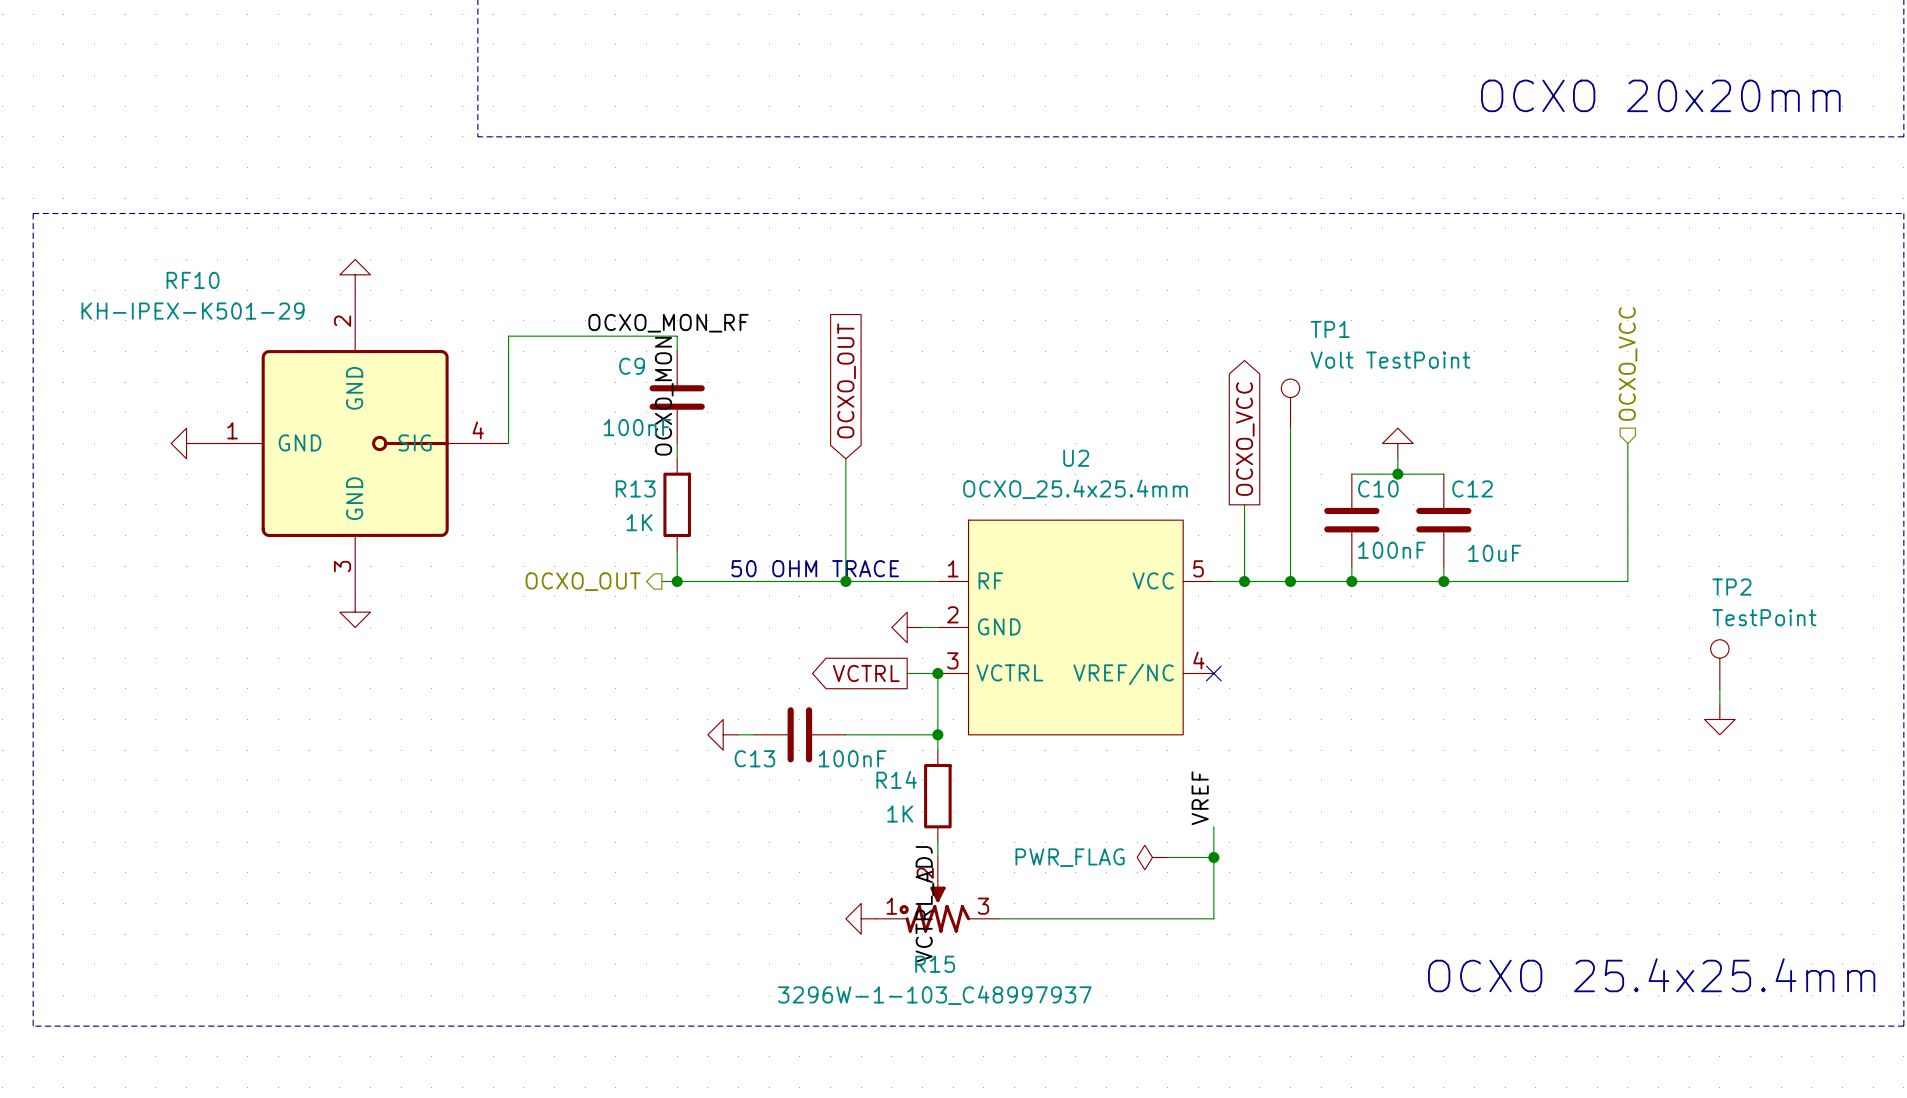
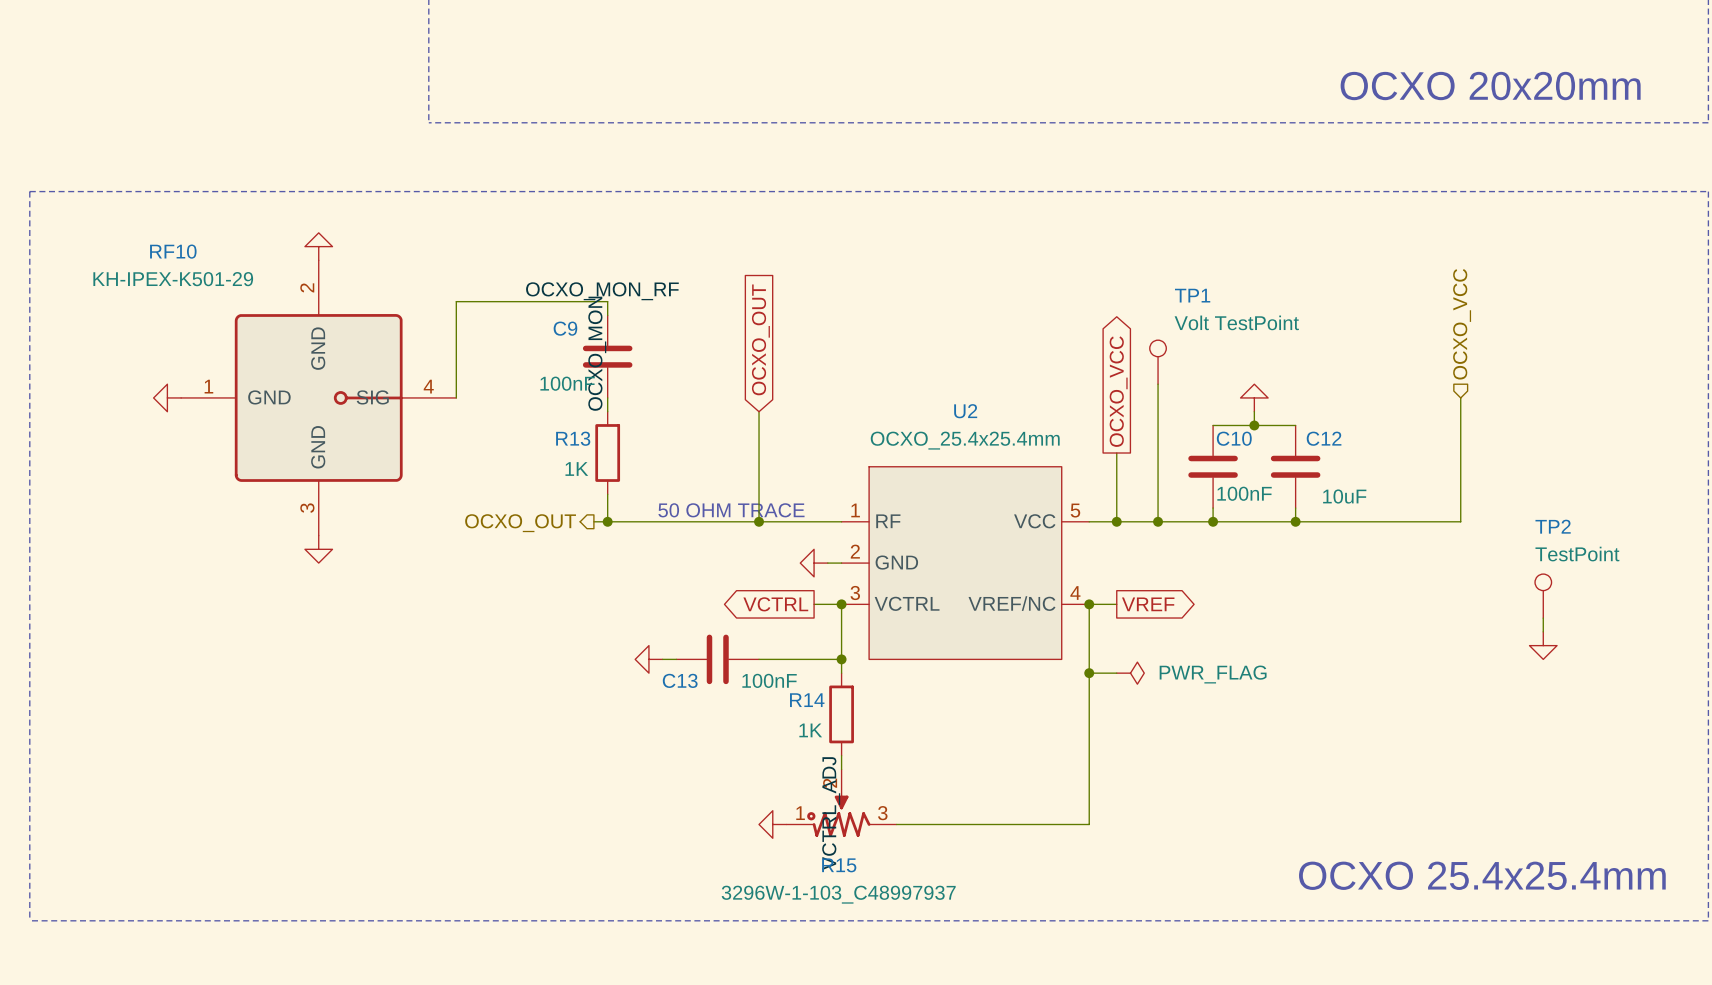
junction: none -> (1089, 604)
no-connect mark: (1213, 673) -> none
wire: none -> (1116, 604) (1089, 604) (1089, 741)
global label: none -> VREF (1148, 604)
wire: none -> (1089, 673) (1116, 673)
junction: none -> (1089, 673)
label: VREF (1200, 798) -> none
power symbol rotation: 0° (1152, 857) -> 180° (1130, 673)
power symbol position: PWR_FLAG (1152, 857) -> PWR_FLAG (1130, 673)
wire: (1167, 857) (1213, 857) -> none
junction: (1213, 857) -> none

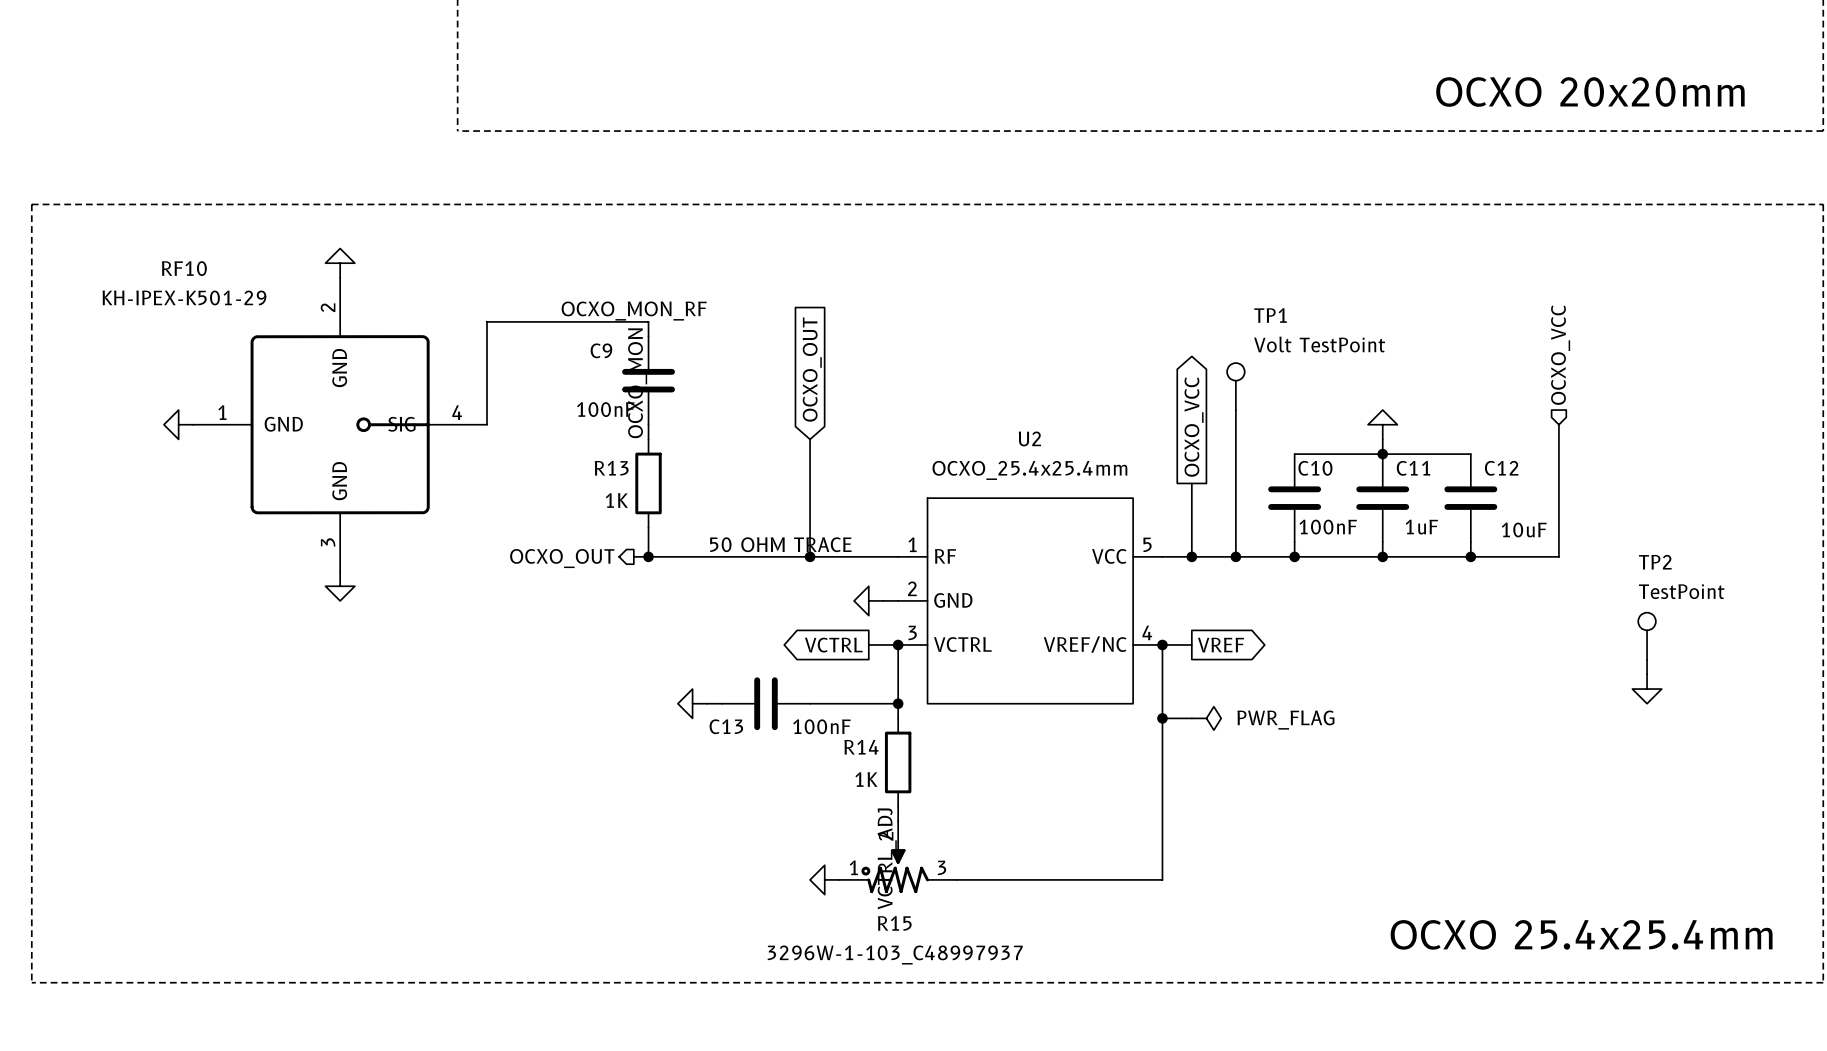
power symbol position: (1254, 397) -> (1382, 424)
wire: (1254, 411) (1254, 425) -> (1470, 542) (1470, 556)
wire: none -> (1382, 439) (1382, 454) (1470, 454)
junction position: (1254, 425) -> (1382, 454)
C12 name: C12 (1324, 438) -> C11 (1413, 468)
C12: none -> 10uF (1470, 498)
C12 value: 10uF (1344, 496) -> 1uF (1421, 527)
junction: none -> (1470, 556)

